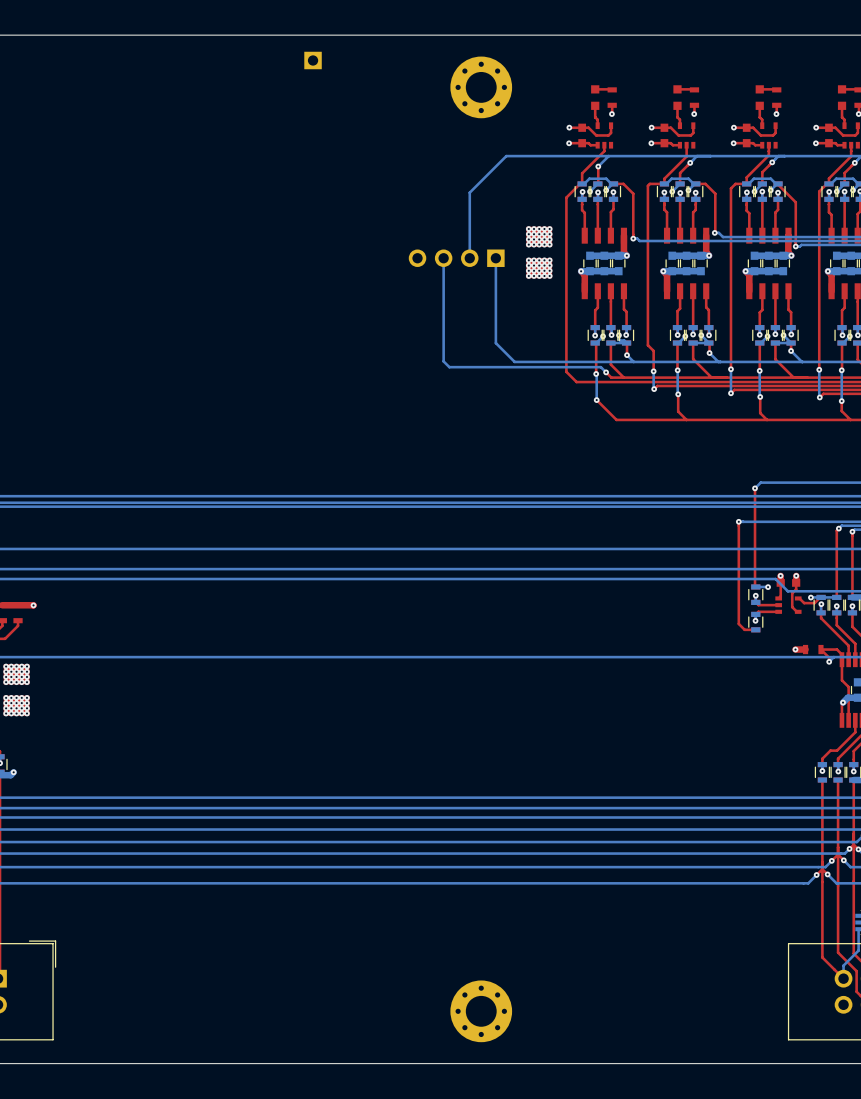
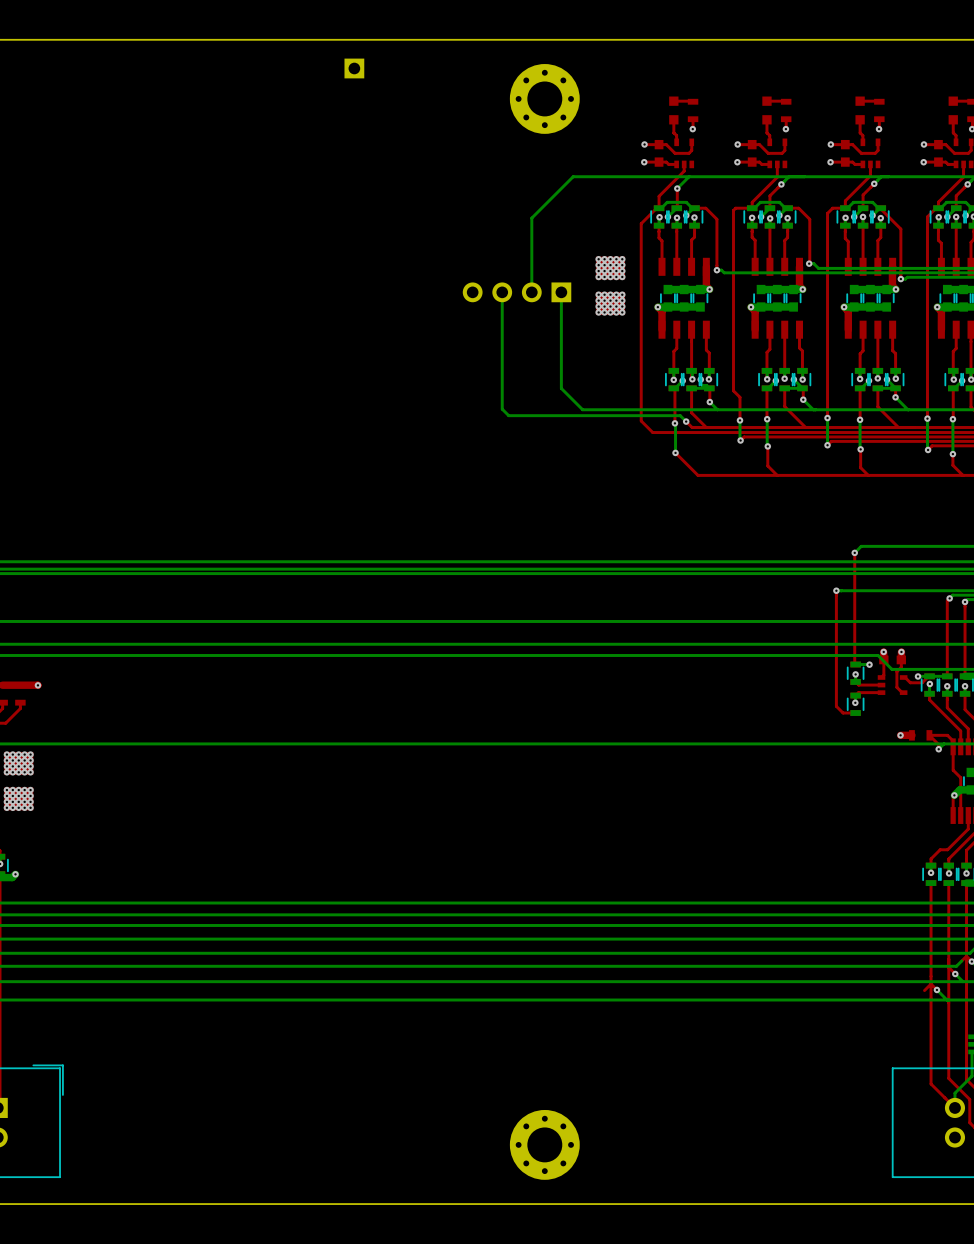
via: (849, 848) -> none
top track: (838, 854) (831, 860) -> none
bottom track: (831, 860) (825, 867) -> (962, 981) (934, 981)
via: (831, 860) -> none
bottom track: (816, 874) (808, 883) -> (947, 1000) (915, 1000)
via: (816, 874) -> none

